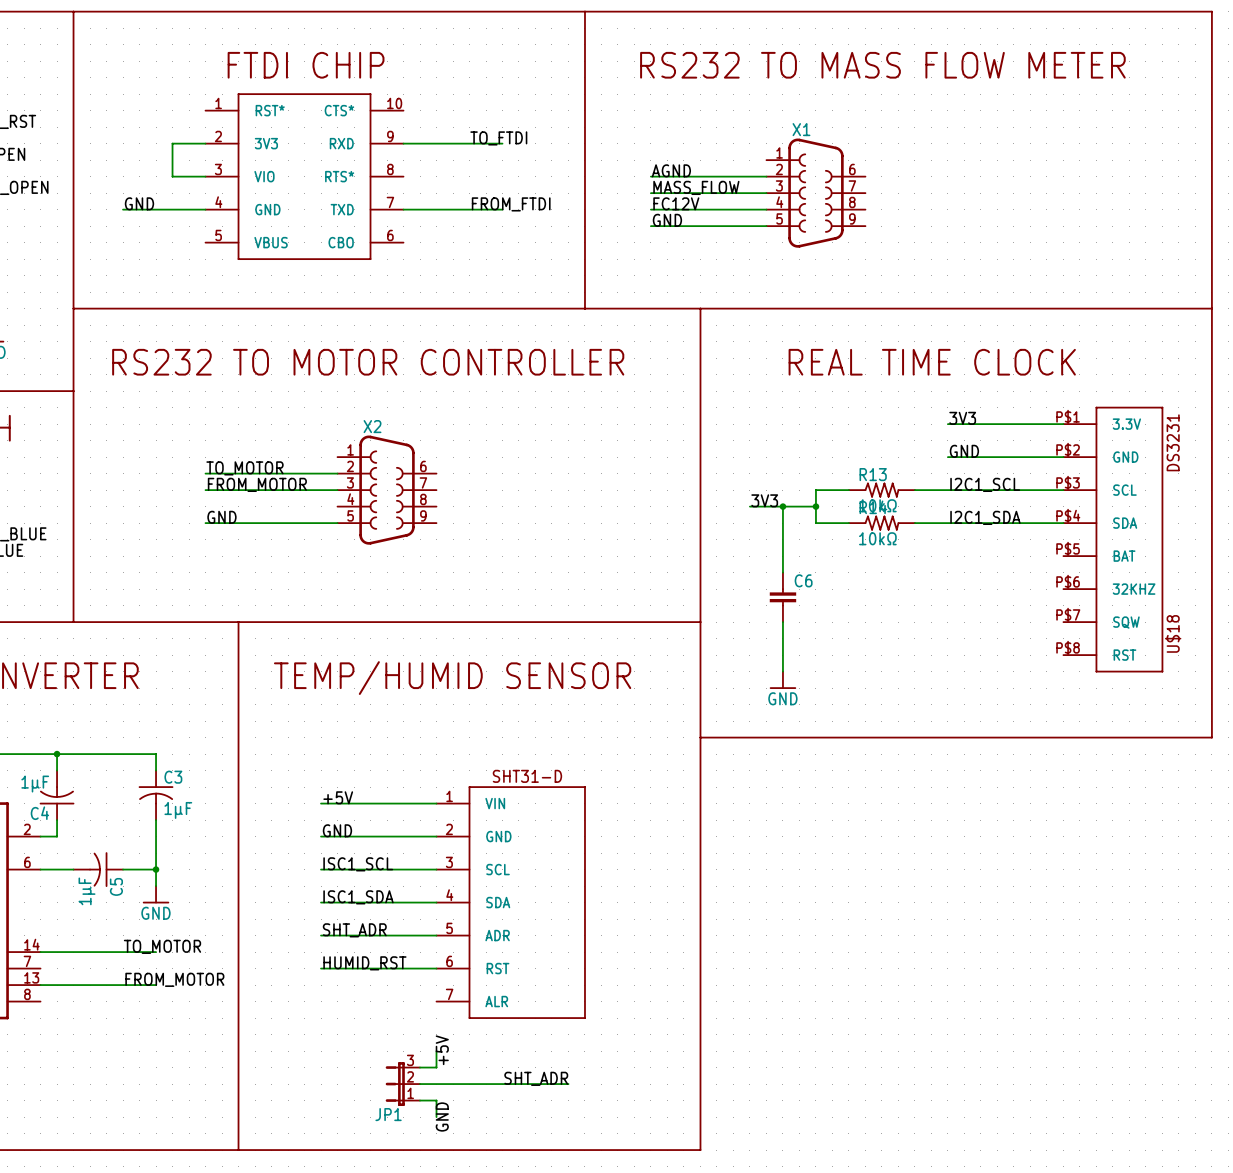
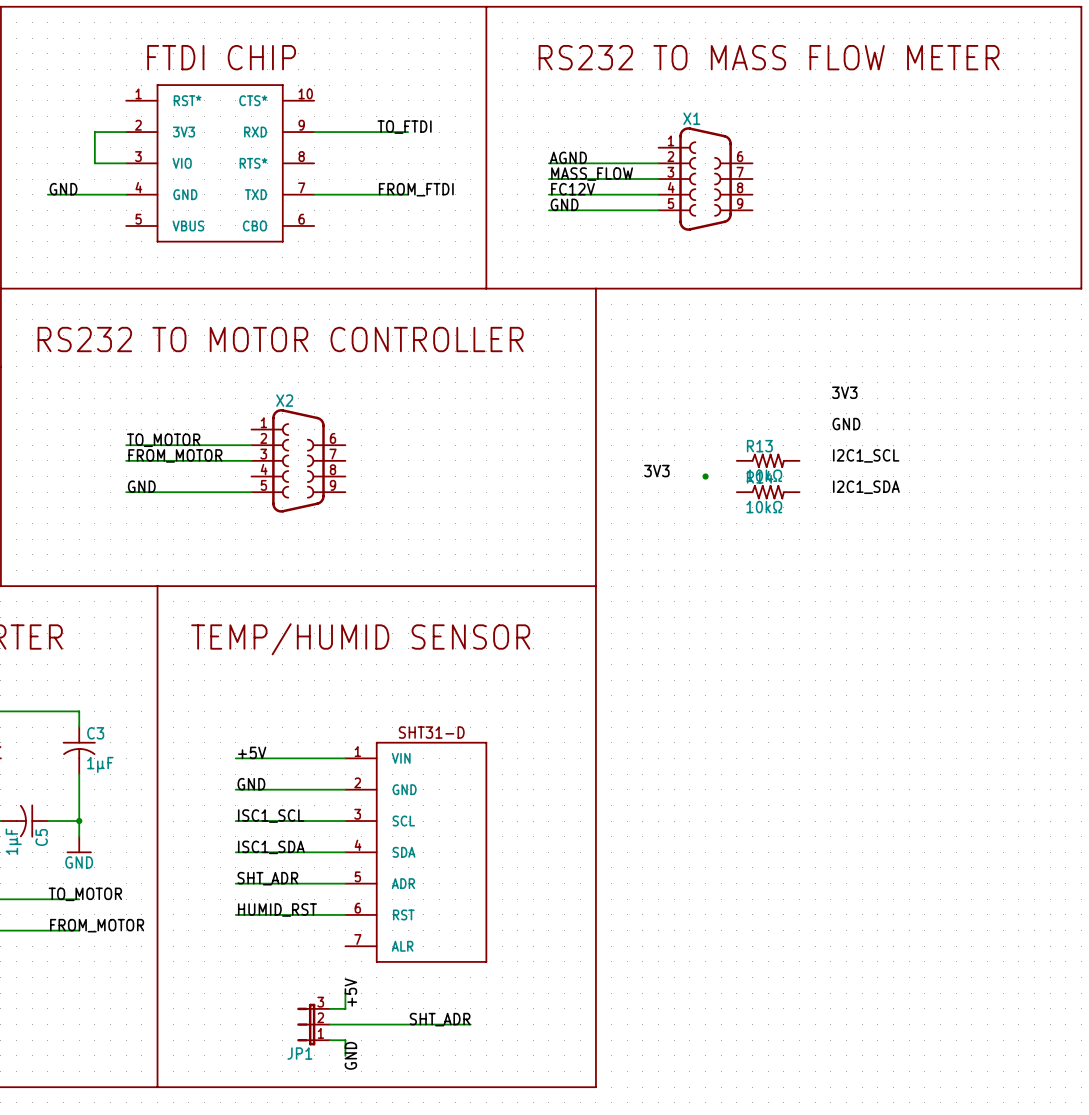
line: (1211, 308) (1211, 737) (700, 737) -> none
text: REAL TIME CLOCK (932, 362) -> none
wire: (947, 424) (1063, 424) -> none
wire: (947, 457) (1063, 457) -> none
wire: (848, 490) (815, 490) (815, 523) (848, 523) -> none
wire: (914, 490) (1063, 490) -> none
wire: (749, 506) (815, 506) -> none
wire: (782, 506) (782, 572) -> none
junction: (782, 506) -> none
wire: (914, 523) (1063, 523) -> none
U$18: DS3231 (1113, 539) -> none
C6: (782, 597) -> none
wire: (782, 622) (782, 671) -> none
power symbol: GND (782, 680) -> none

